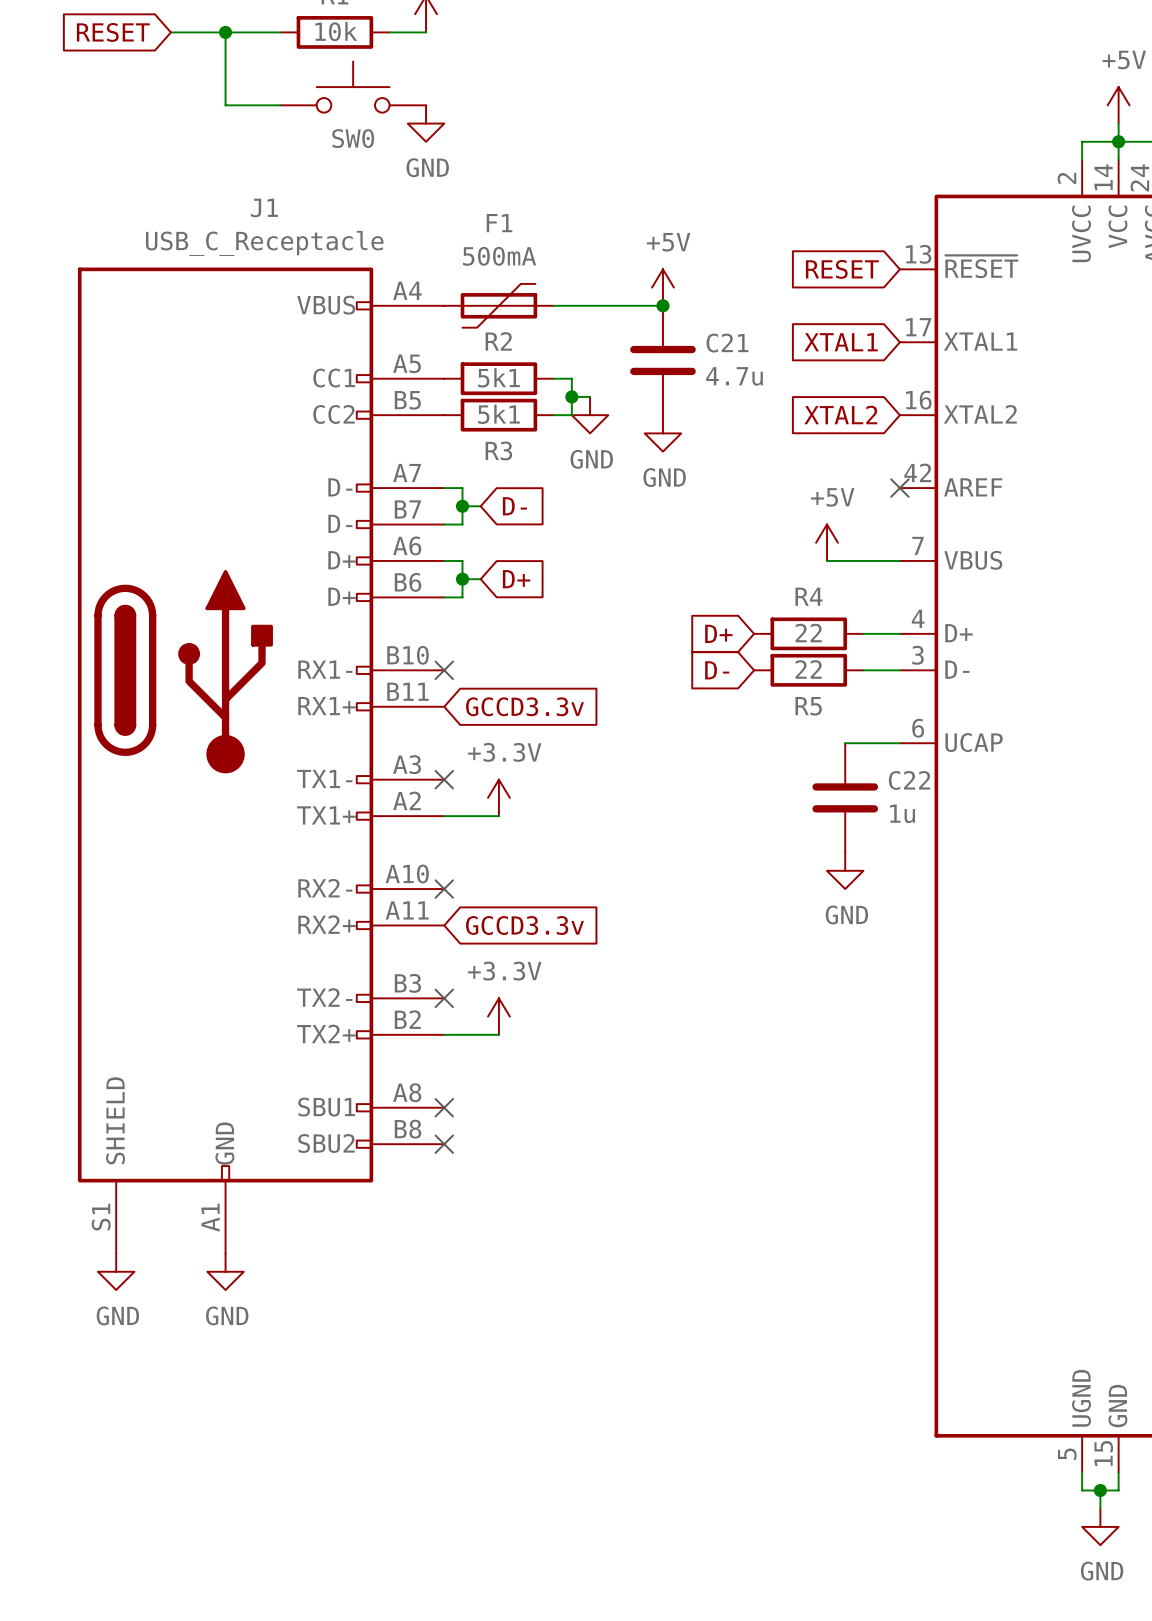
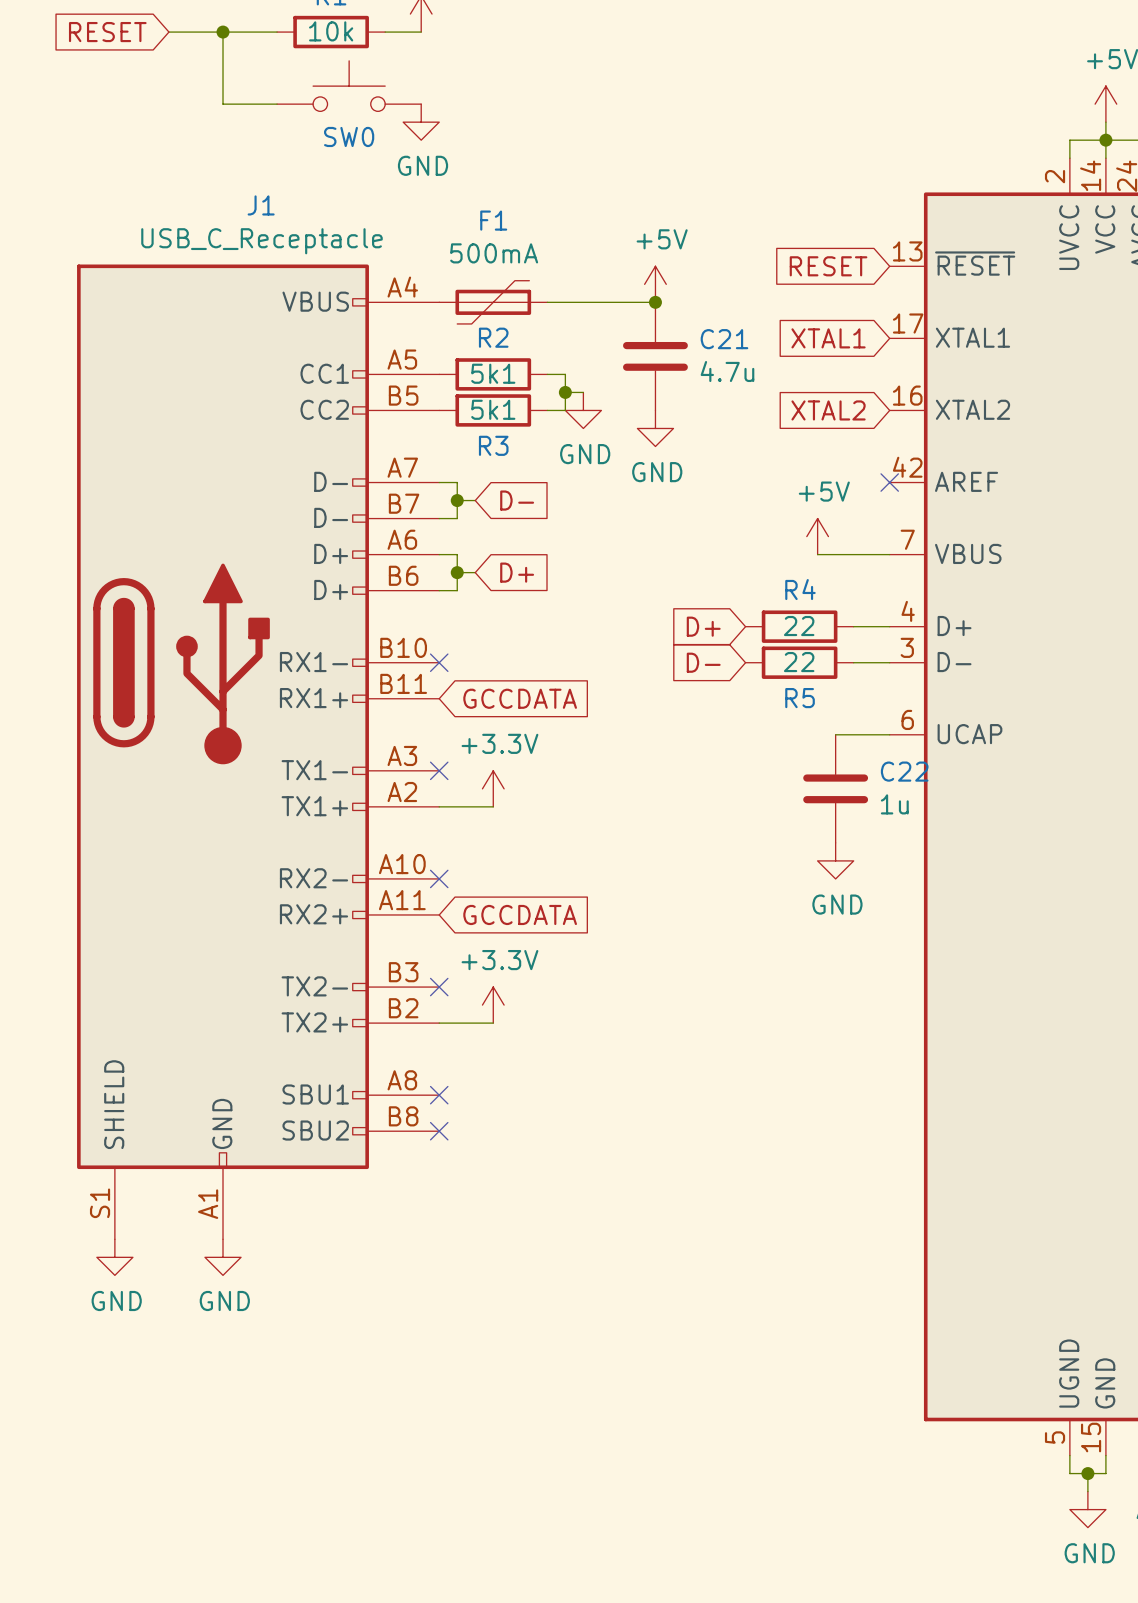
global label: GCCD3.3v (524, 706) -> GCCDATA (520, 698)
global label: GCCD3.3v (524, 925) -> GCCDATA (520, 914)

